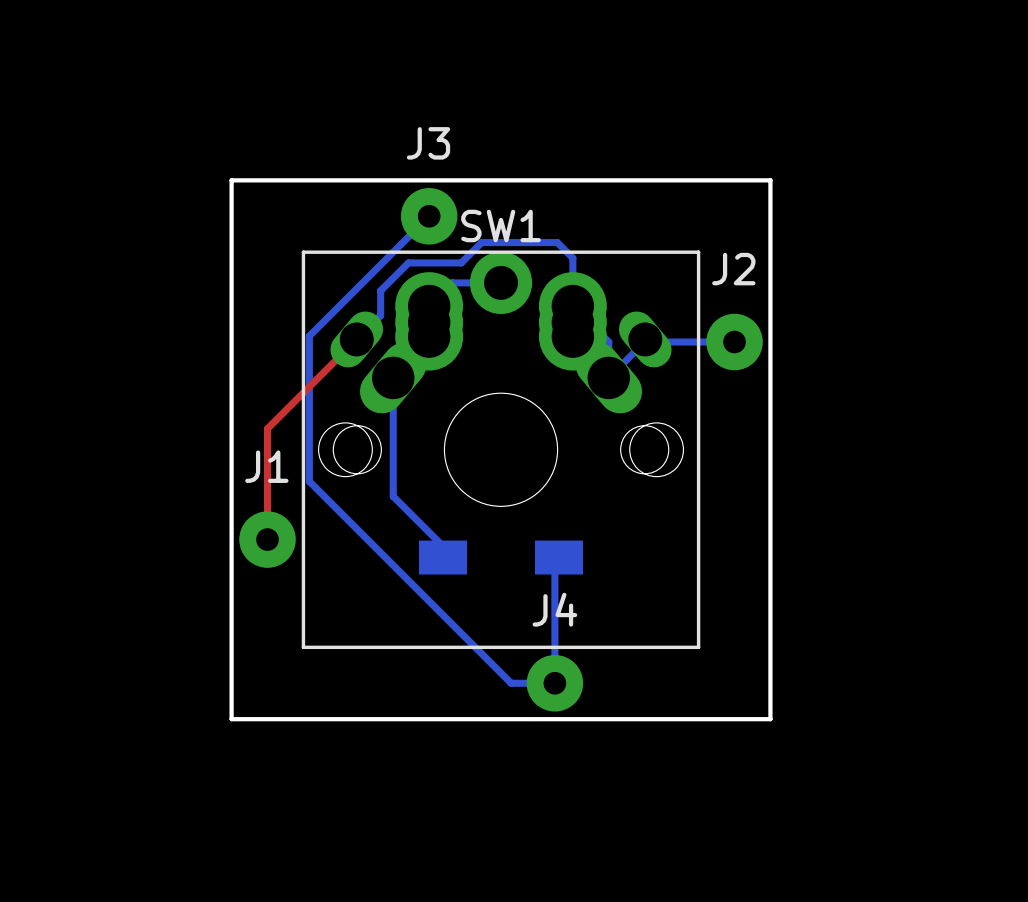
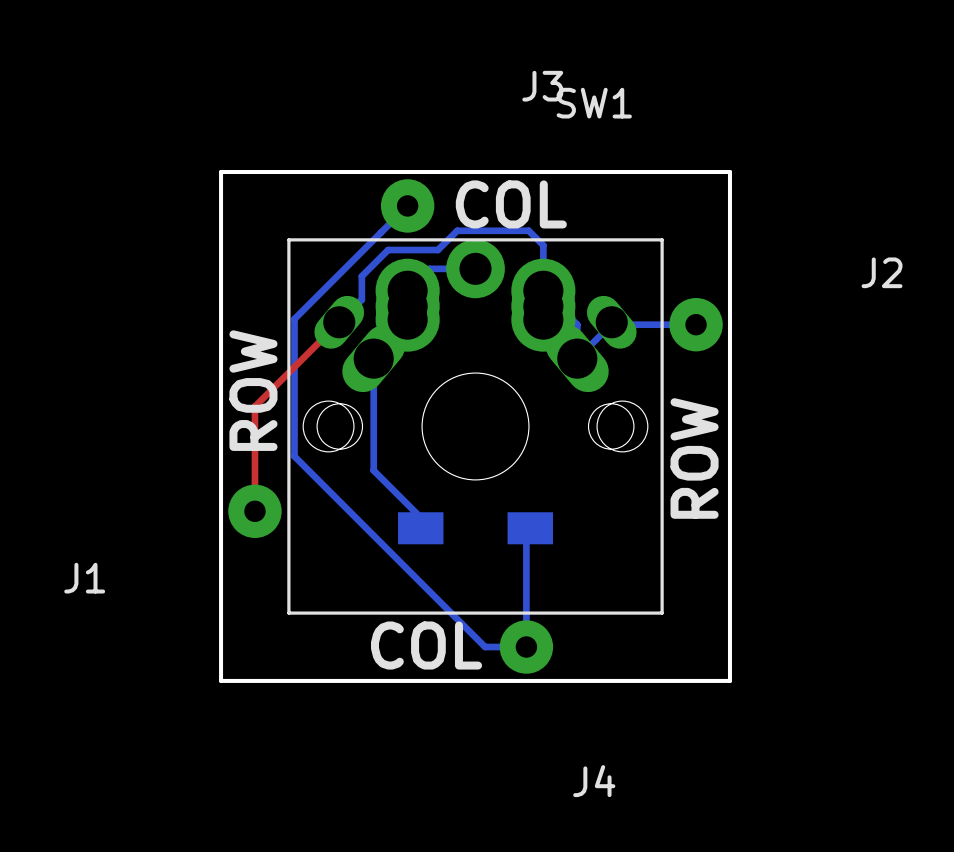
J3 name position: J3 (428, 143) -> J3 (542, 86)
text: none -> COL (511, 204)
SW1 name position: SW1 (501, 225) -> SW1 (594, 103)
J2 name position: J2 (733, 269) -> J2 (882, 272)
text: none -> ROW (253, 390)
J1 name position: J1 (266, 466) -> J1 (84, 578)
text: none -> ROW (694, 458)
J4 name position: J4 (554, 609) -> J4 (594, 781)
text: none -> COL (426, 645)

